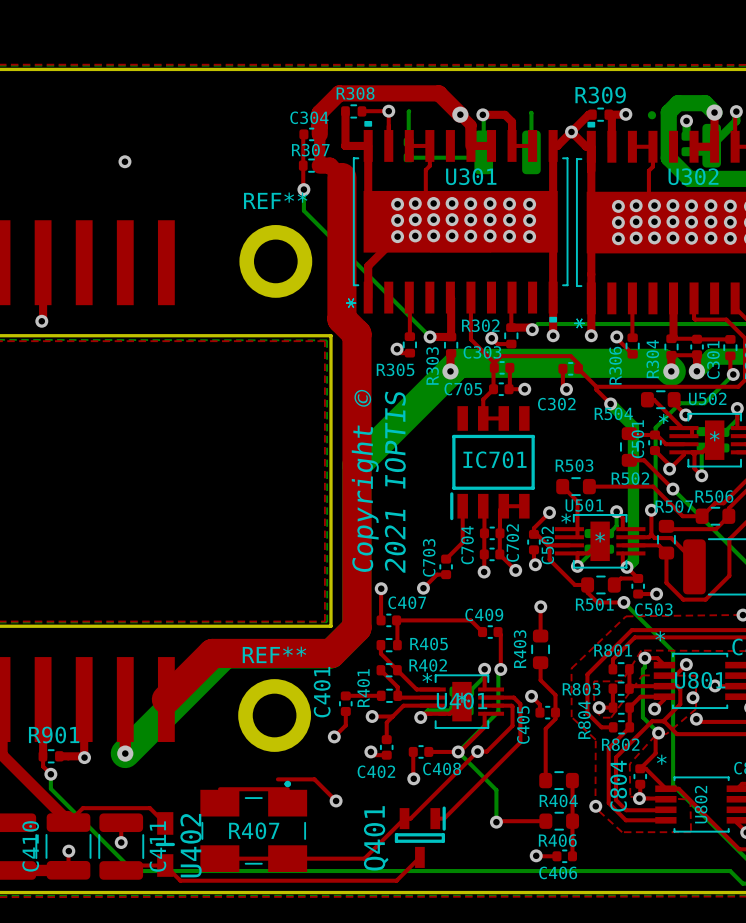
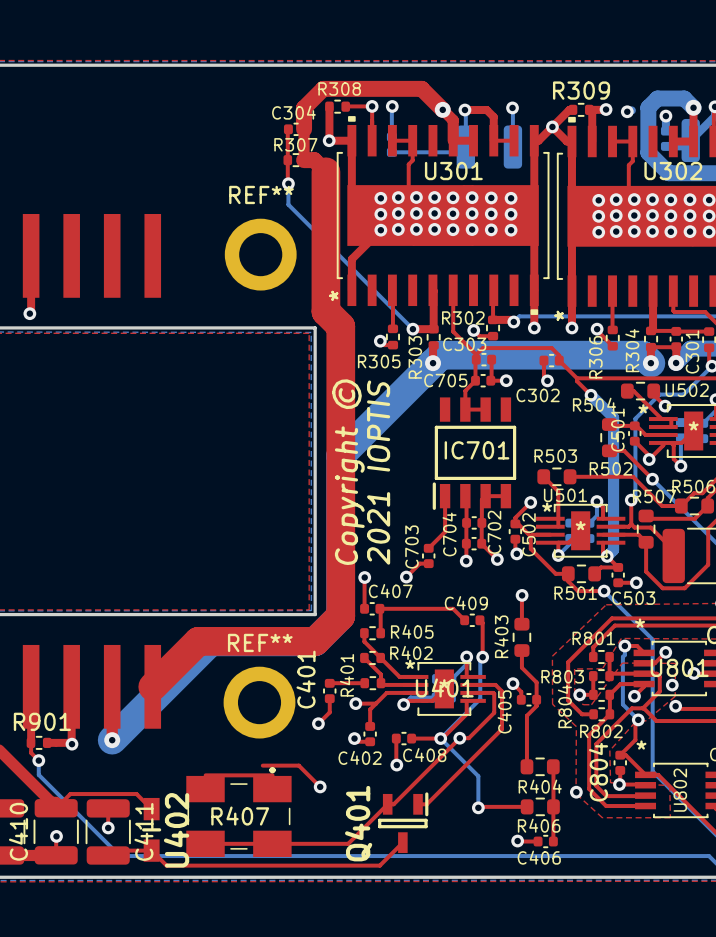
via: none -> (392, 106)
via: none -> (512, 107)
via: none -> (627, 111)
via: none -> (329, 140)
via: (124, 161) -> none

